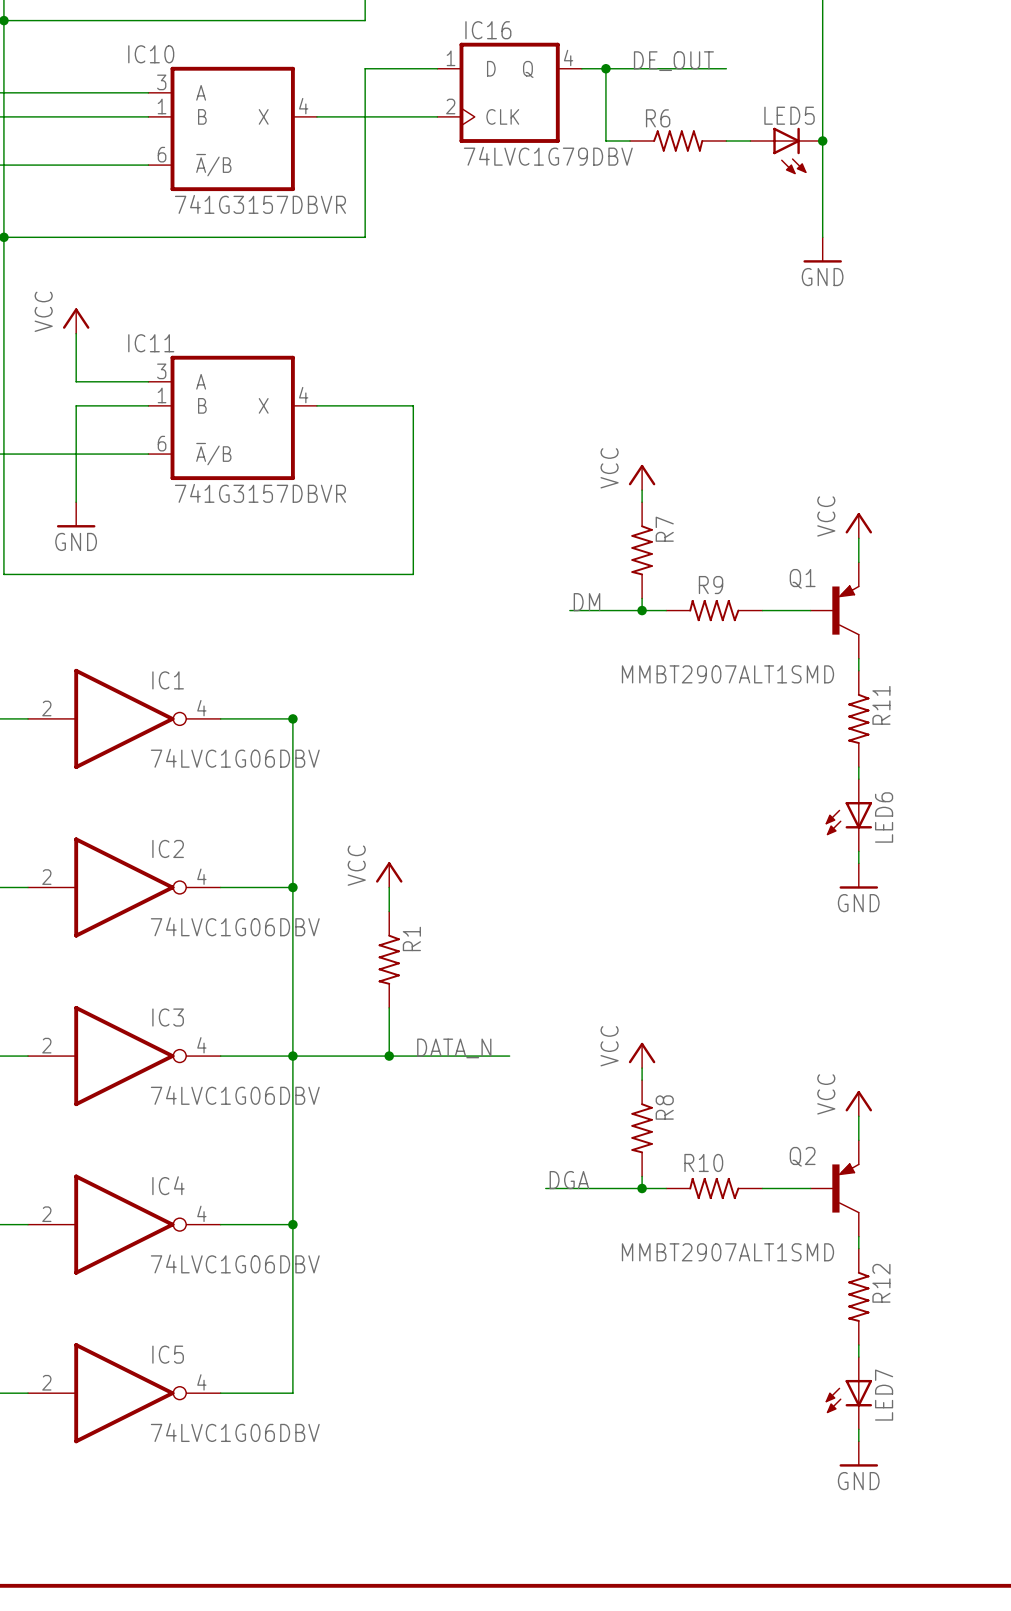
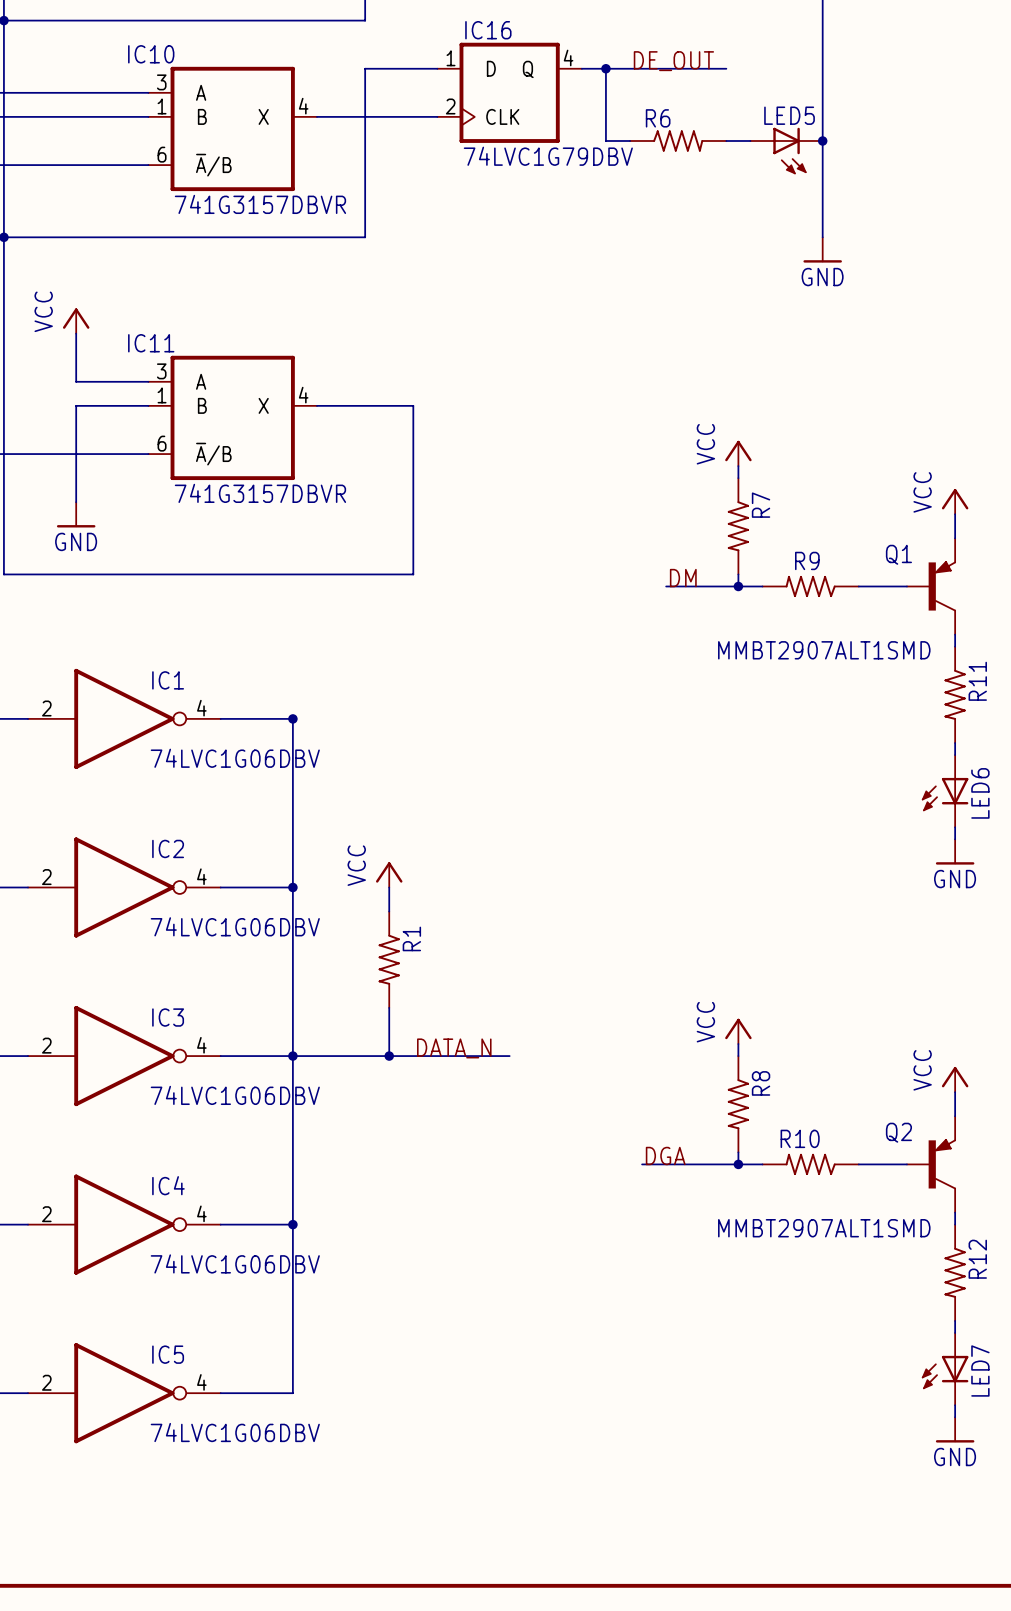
power symbol: none -> VCC (738, 453)
power symbol: VCC (642, 477) -> none
wire: (642, 490) (642, 502) -> (738, 466) (738, 478)
power symbol: none -> VCC (955, 501)
power symbol: VCC (858, 525) -> none
wire: (858, 538) (858, 562) -> (955, 514) (955, 538)
R7 position: (642, 550) -> (738, 526)
junction: none -> (738, 586)
wire: (642, 598) (642, 610) -> (738, 574) (738, 586)
label position: DM (586, 602) -> DM (683, 578)
wire: (569, 610) (666, 610) -> (666, 586) (762, 586)
junction: (642, 610) -> none
R9 position: (714, 610) -> (810, 586)
wire: (762, 610) (810, 610) -> (858, 586) (906, 586)
Q1 position: (835, 610) -> (931, 586)
wire: (858, 658) (858, 670) -> (955, 634) (955, 646)
R11 position: (858, 718) -> (955, 694)
wire: (858, 767) (858, 779) -> (955, 743) (955, 755)
LED6 position: (848, 815) -> (945, 791)
wire: (858, 851) (858, 863) -> (955, 827) (955, 839)
power symbol position: GND (858, 876) -> GND (955, 851)
power symbol: none -> VCC (738, 1031)
power symbol: VCC (642, 1055) -> none
wire: (642, 1068) (642, 1080) -> (738, 1044) (738, 1056)
power symbol: none -> VCC (955, 1079)
power symbol: VCC (858, 1103) -> none
wire: (858, 1116) (858, 1140) -> (955, 1092) (955, 1116)
R8 position: (642, 1128) -> (738, 1104)
junction: none -> (738, 1164)
wire: (642, 1176) (642, 1188) -> (738, 1152) (738, 1164)
label position: DGA (569, 1180) -> DGA (665, 1155)
wire: (545, 1188) (666, 1188) -> (642, 1164) (762, 1164)
junction: (642, 1188) -> none
R10 position: (714, 1188) -> (810, 1164)
wire: (762, 1188) (810, 1188) -> (858, 1164) (906, 1164)
Q2 position: (835, 1188) -> (931, 1164)
wire: (858, 1236) (858, 1248) -> (955, 1212) (955, 1224)
R12 position: (858, 1296) -> (955, 1272)
wire: (858, 1345) (858, 1357) -> (955, 1320) (955, 1332)
LED7 position: (848, 1393) -> (945, 1369)
wire: (858, 1429) (858, 1441) -> (955, 1405) (955, 1417)
power symbol position: GND (858, 1453) -> GND (955, 1429)

